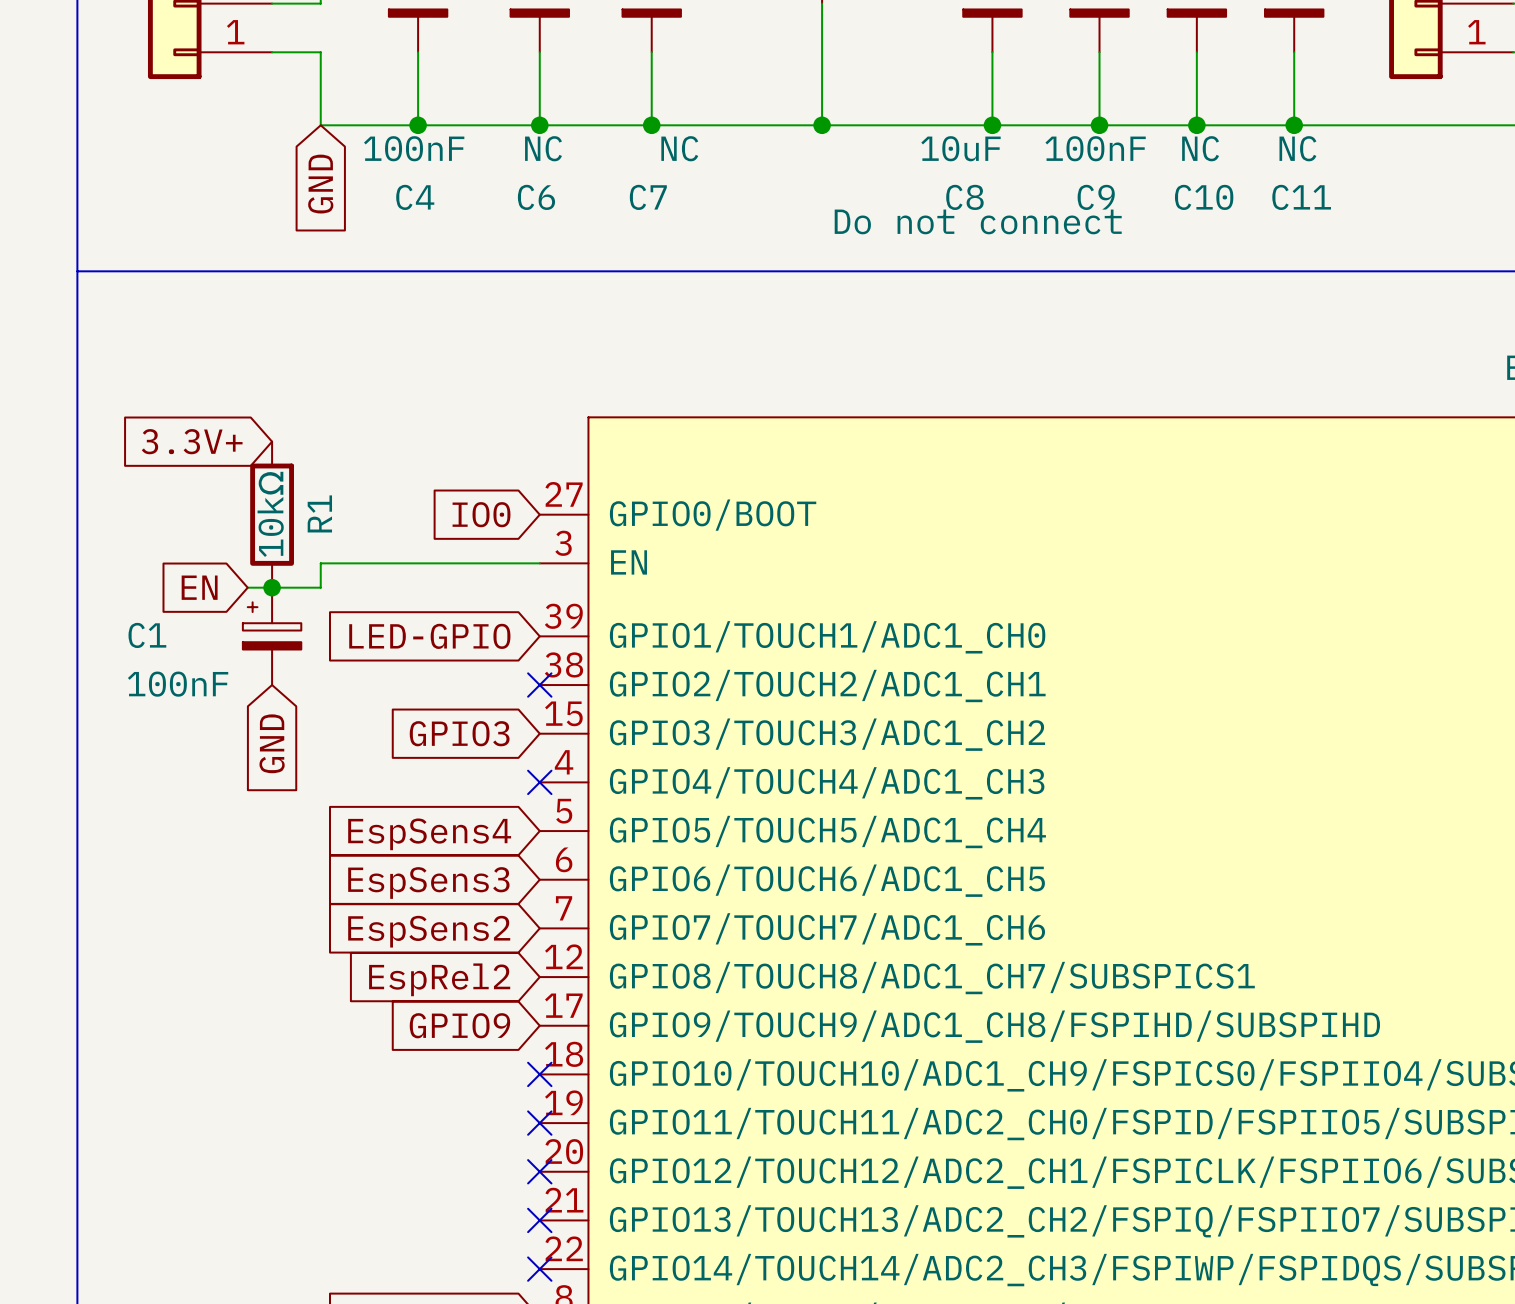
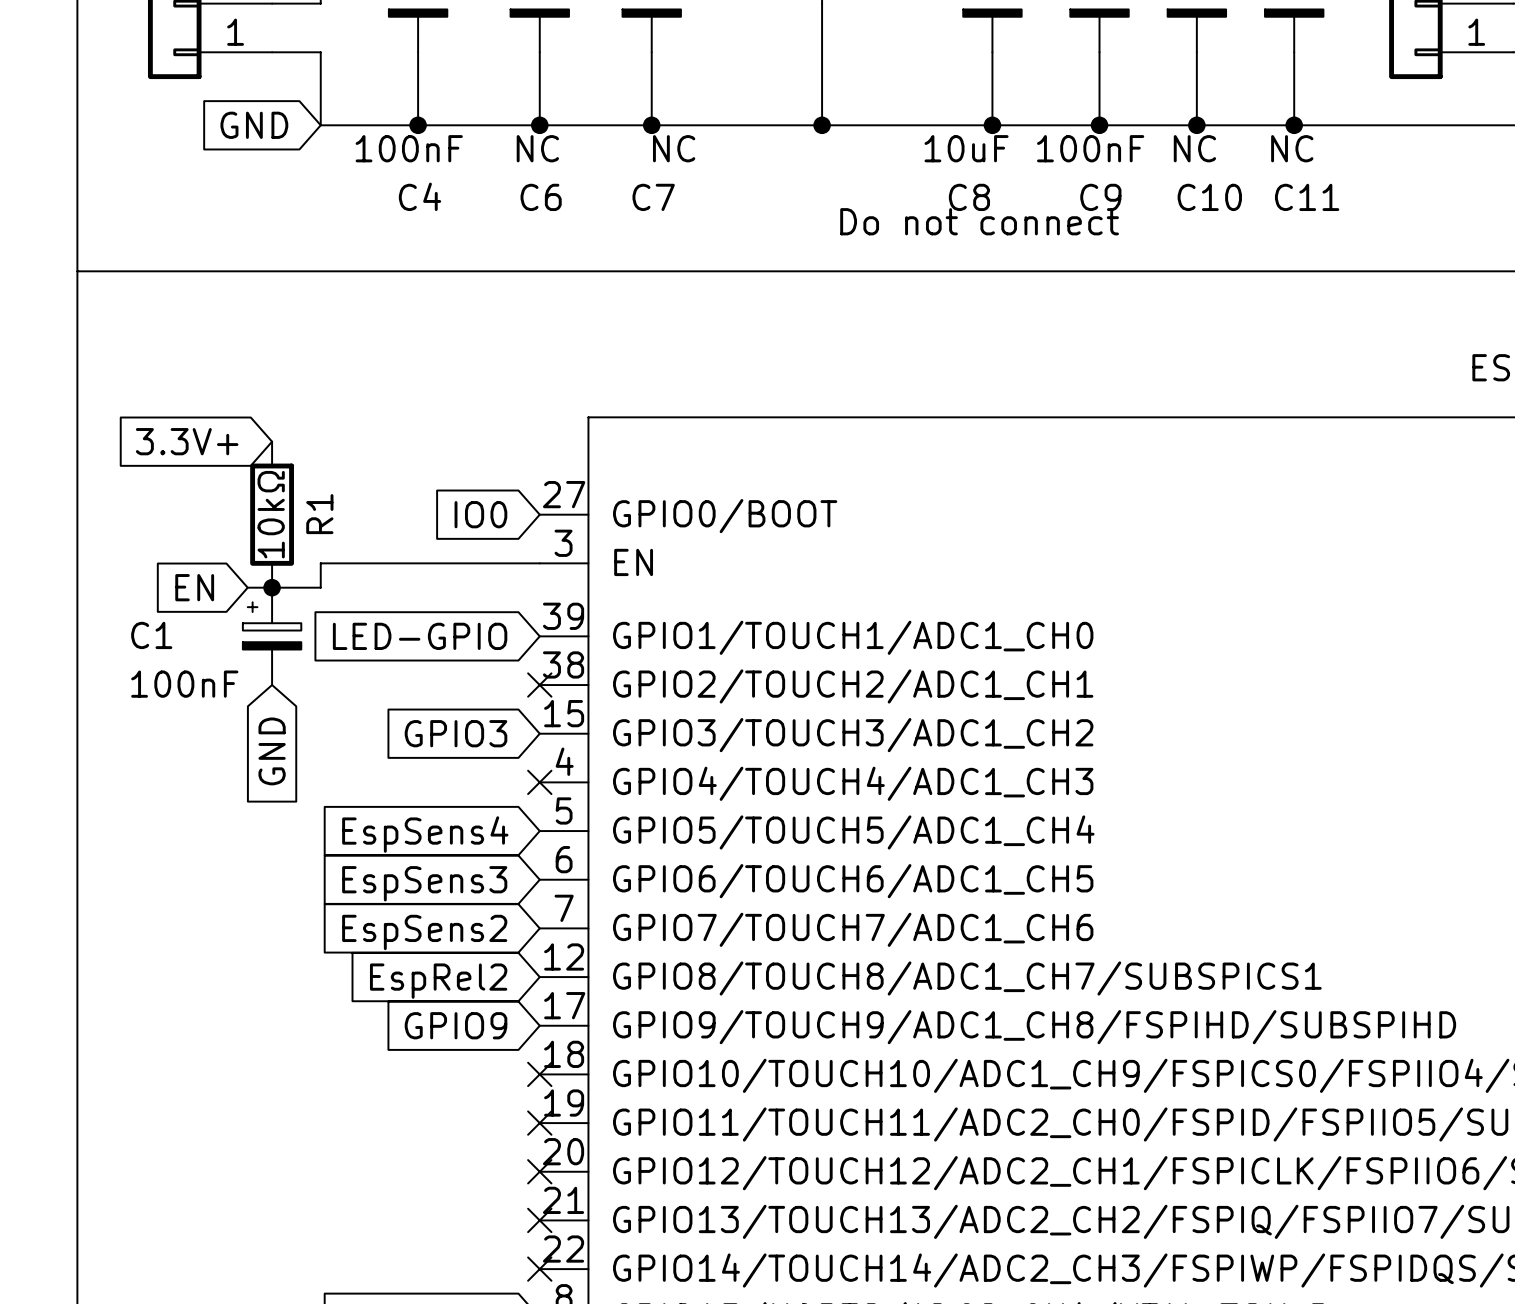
global label rotation: 0° (320, 184) -> 90° clockwise (254, 125)

